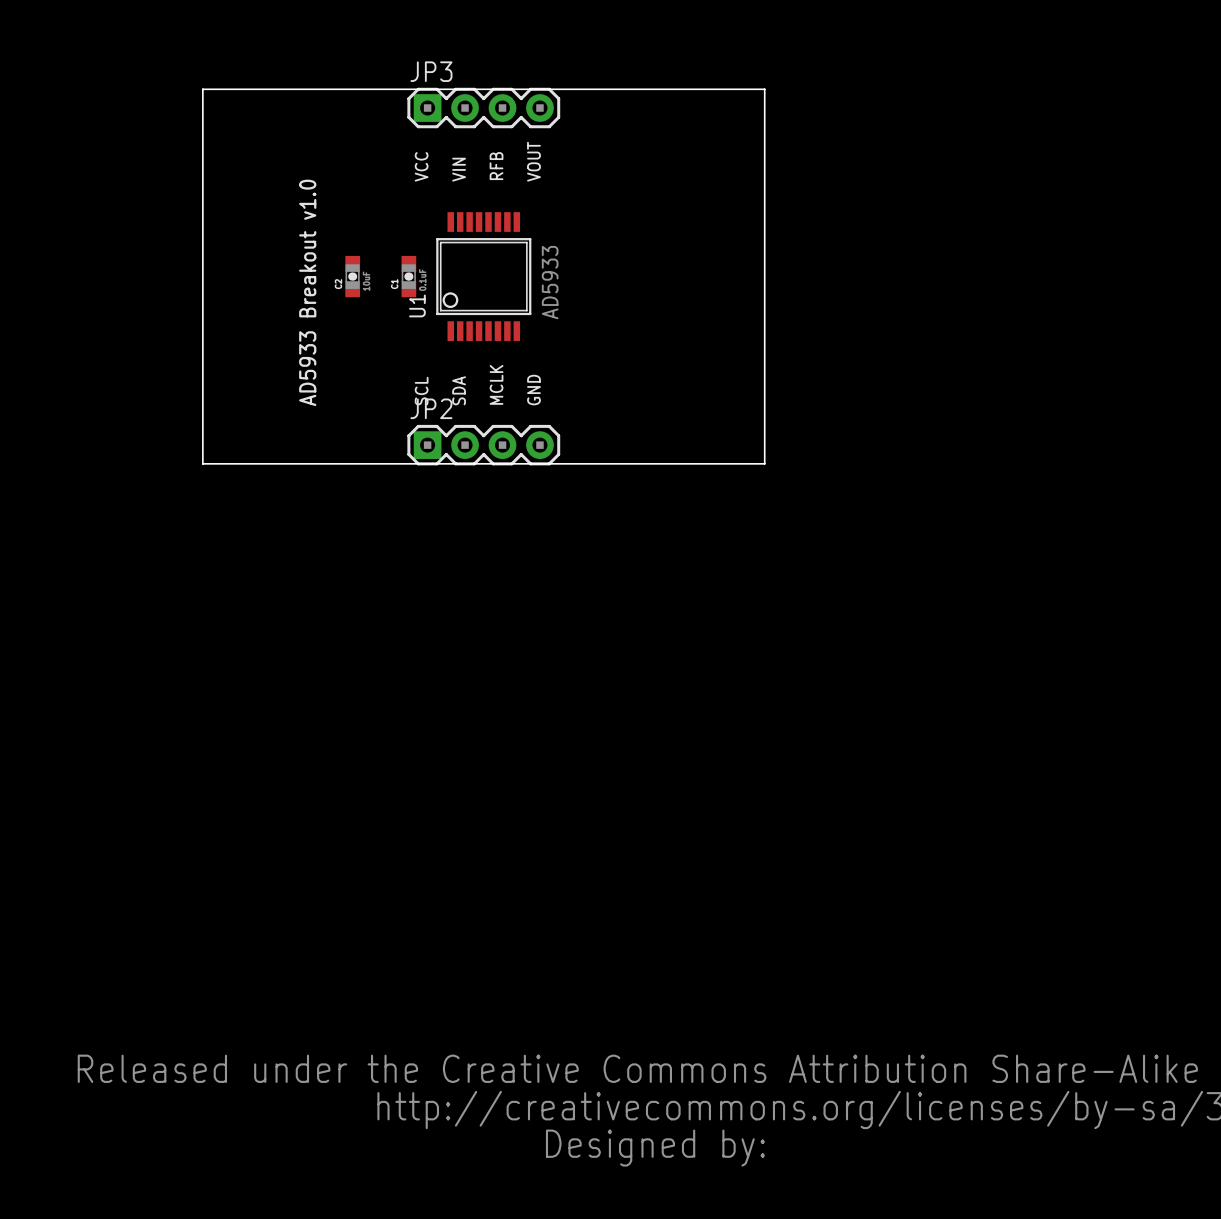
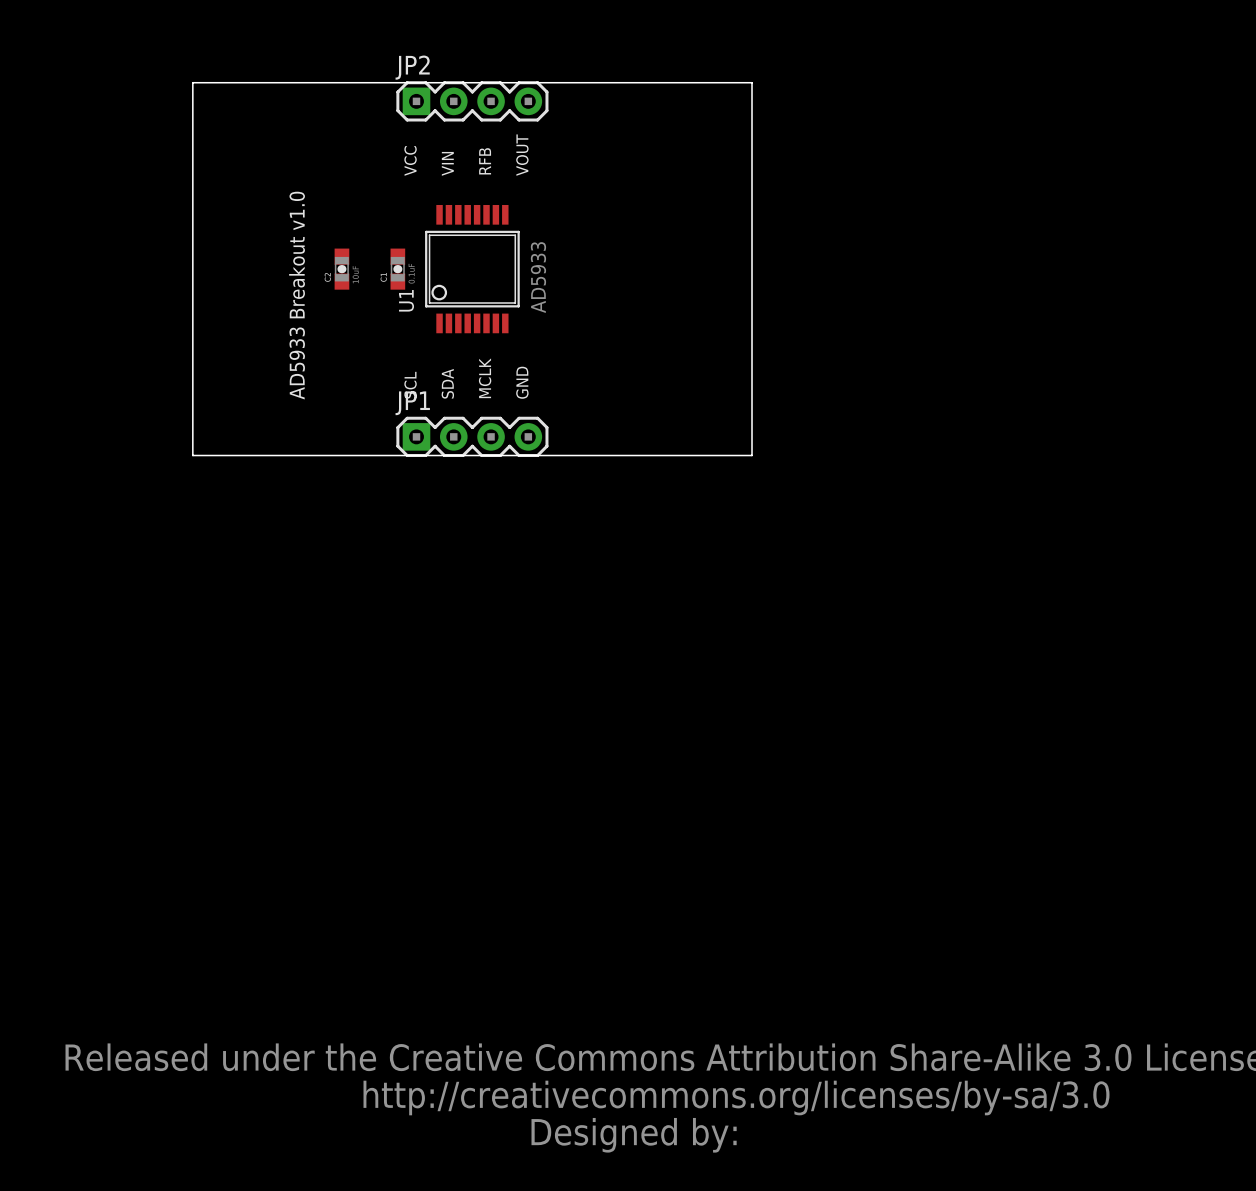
JP3 name: JP3 (431, 71) -> JP2 (412, 67)
JP2 name: JP2 (431, 408) -> JP1 (412, 403)

